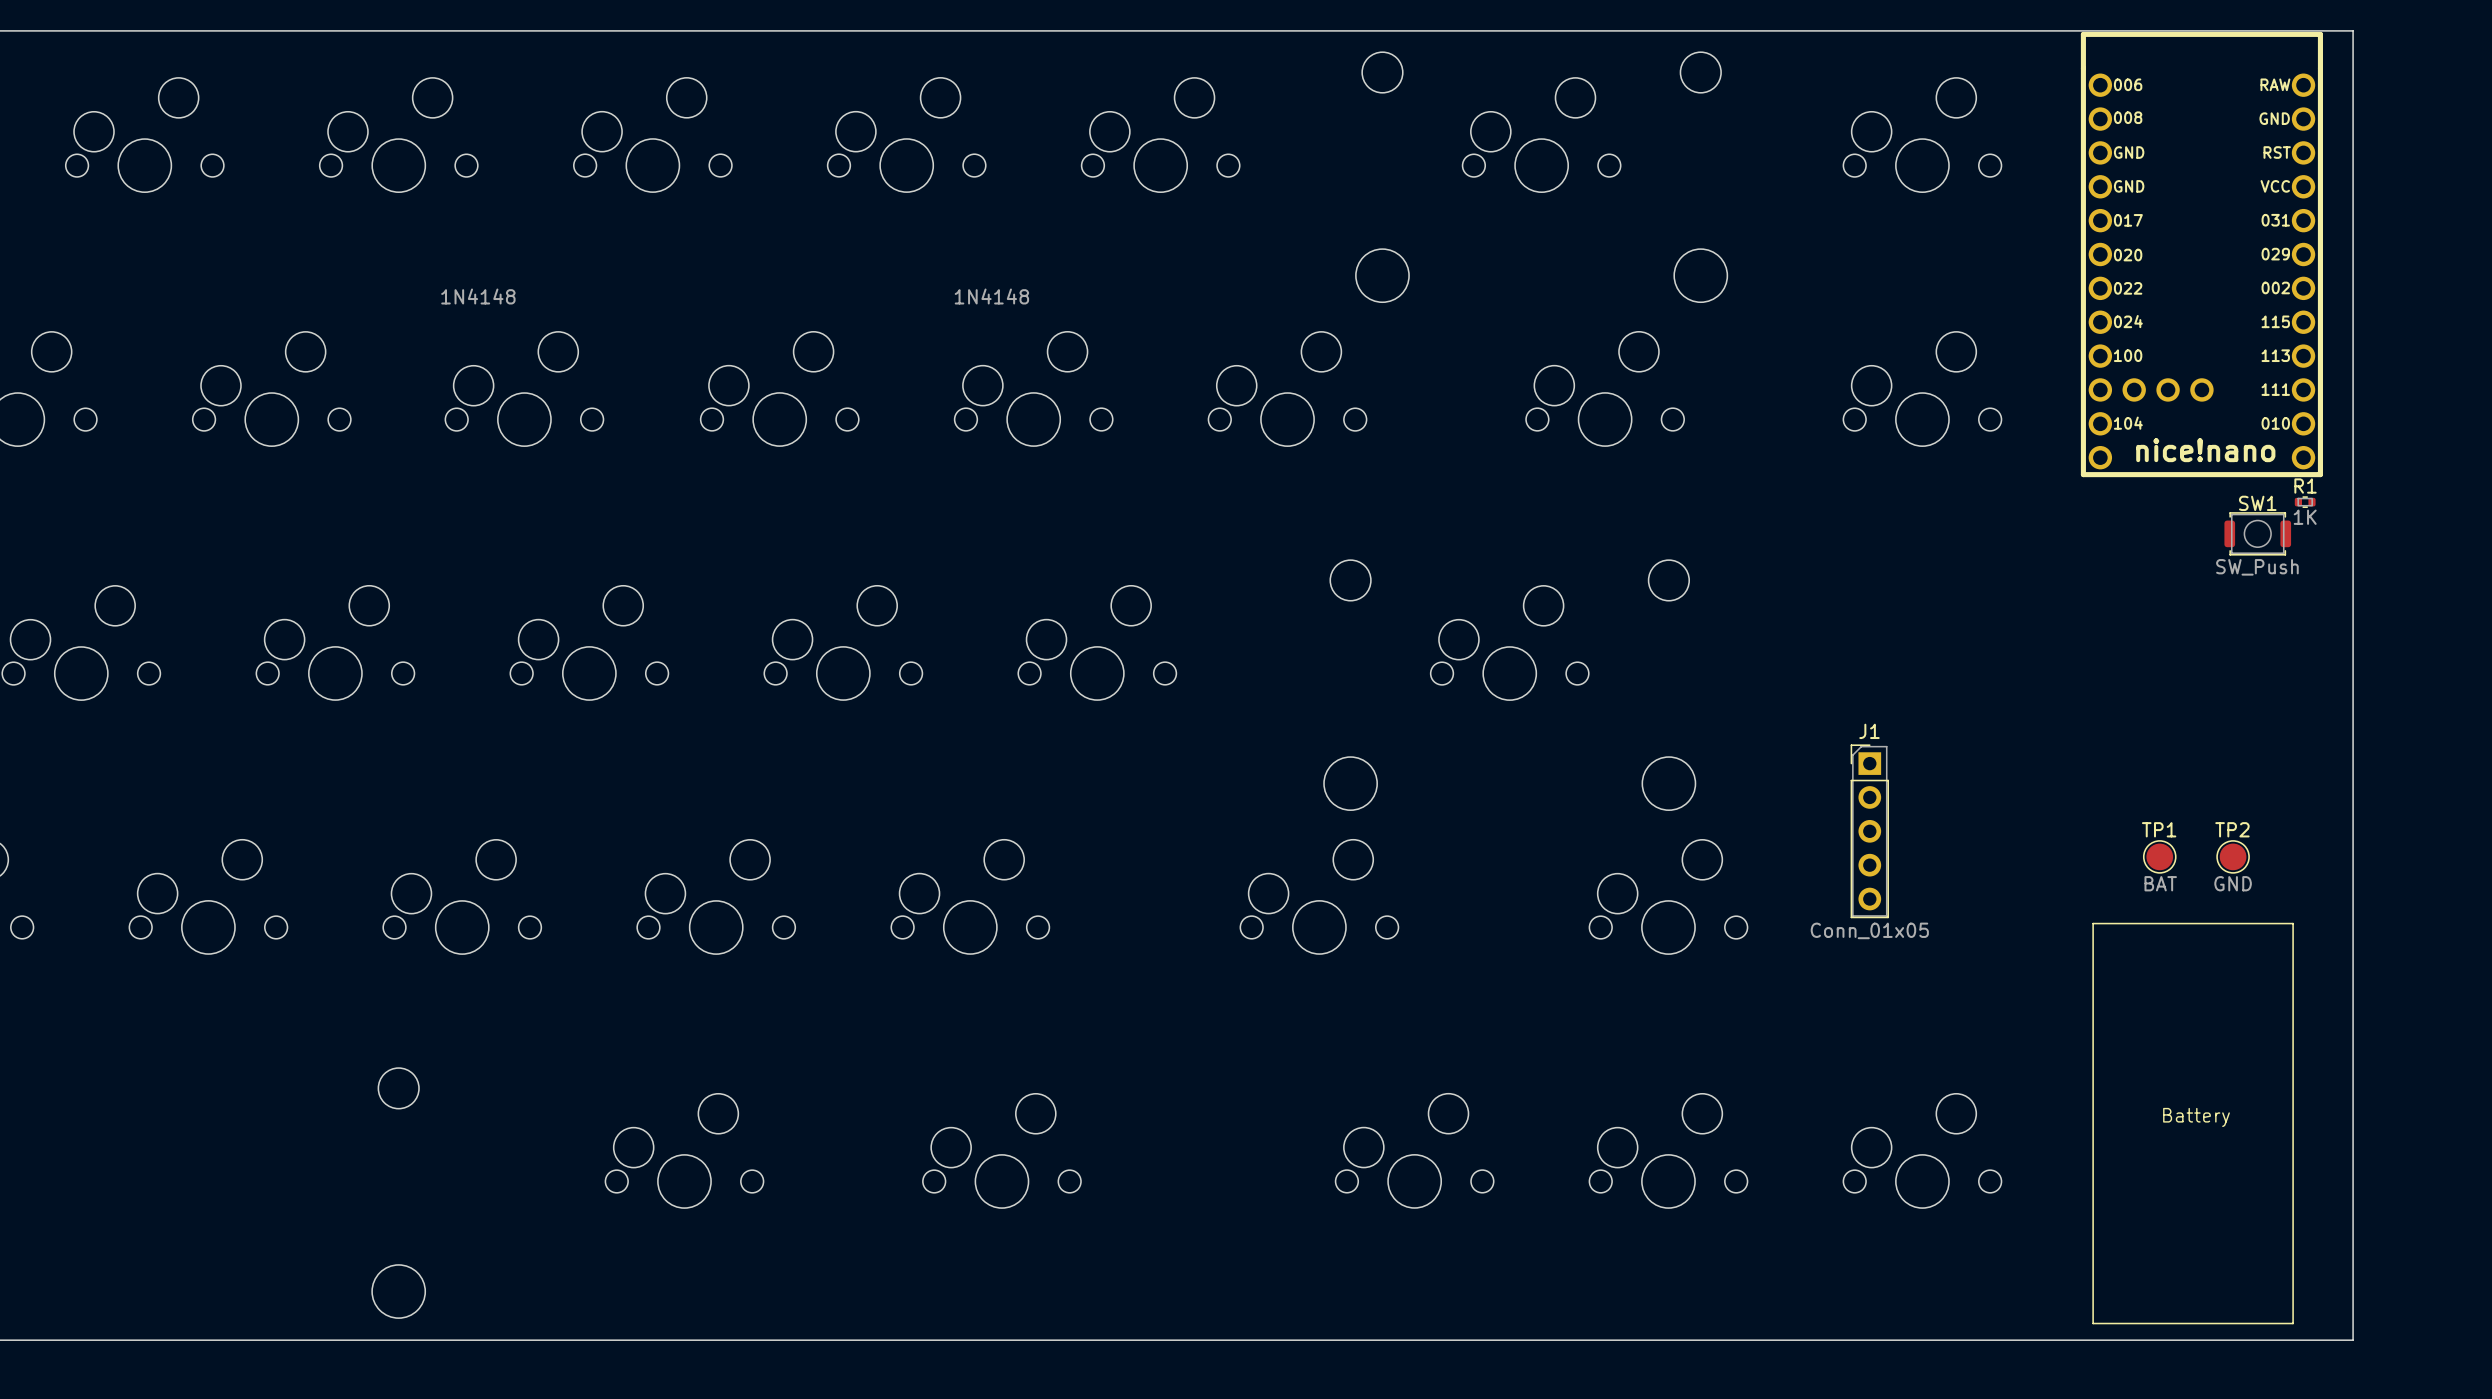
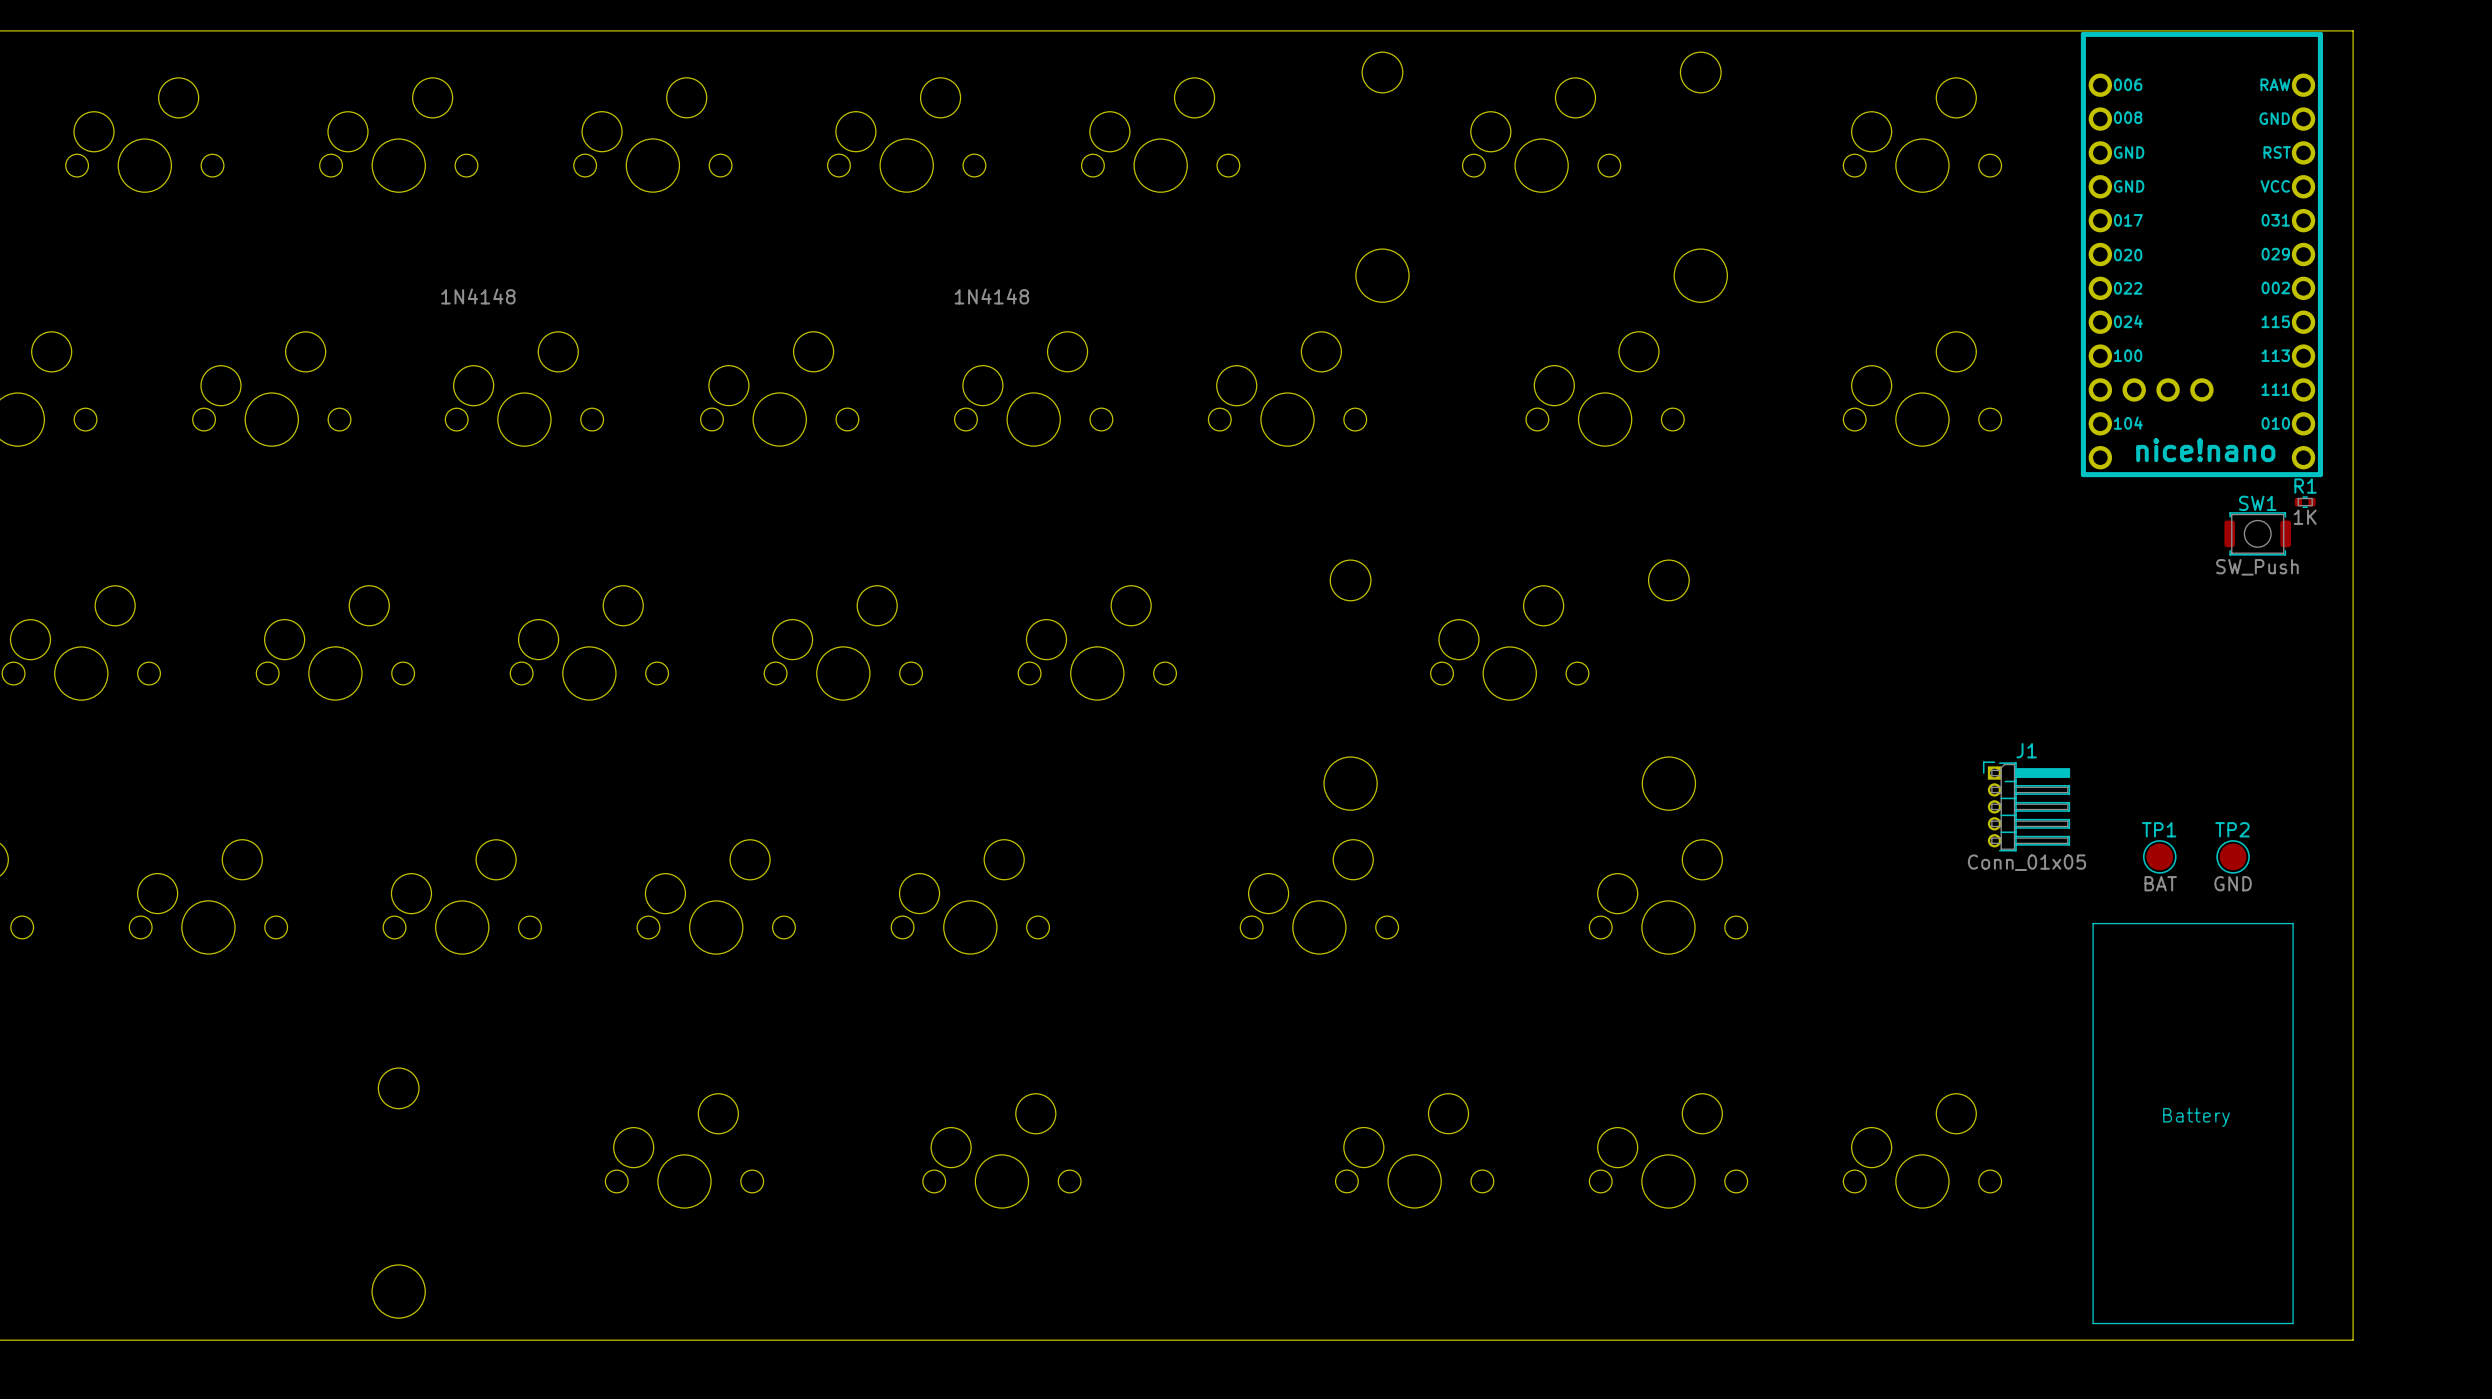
J1 name position: J1 (1869, 731) -> J1 (2026, 750)
J1 footprint: [1850, 744, 1889, 919] -> [1982, 761, 2071, 852]
J1 value position: Conn_01x05 (1869, 930) -> Conn_01x05 (2026, 862)

